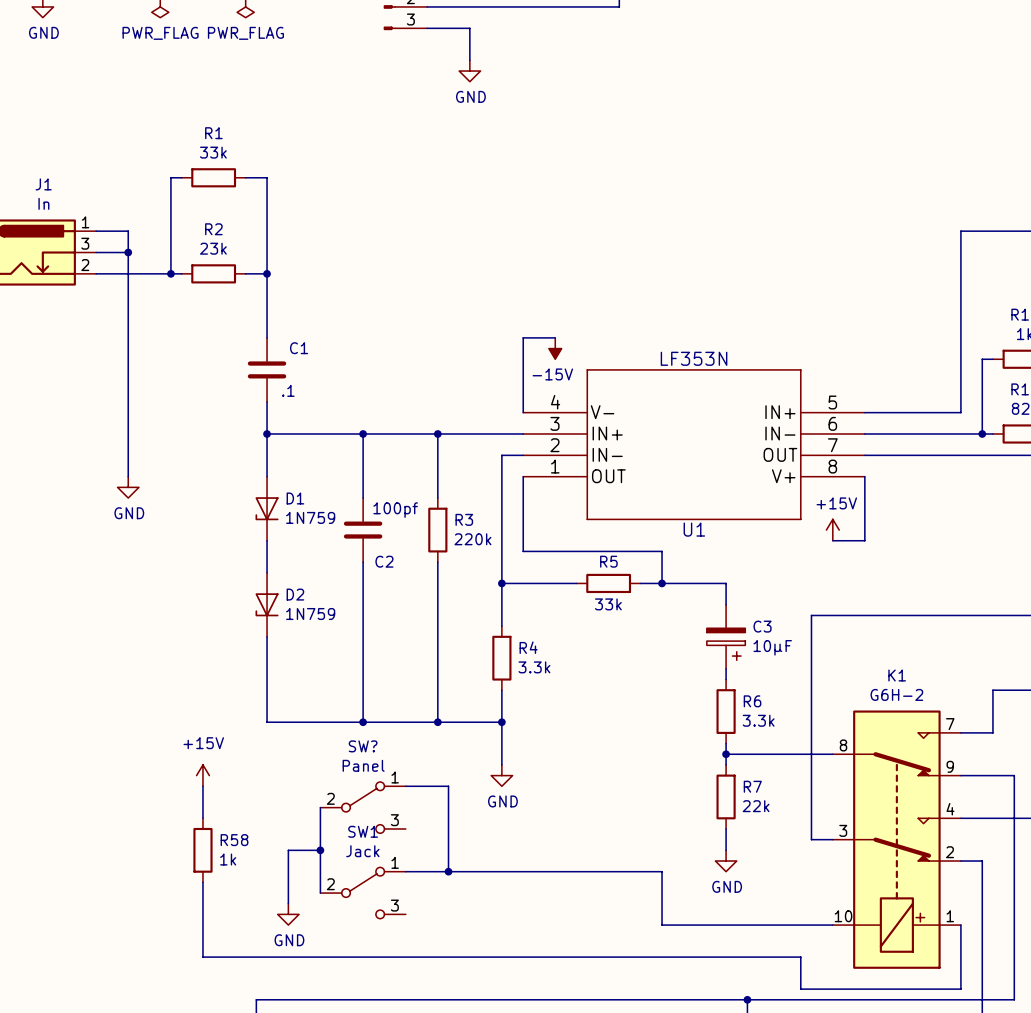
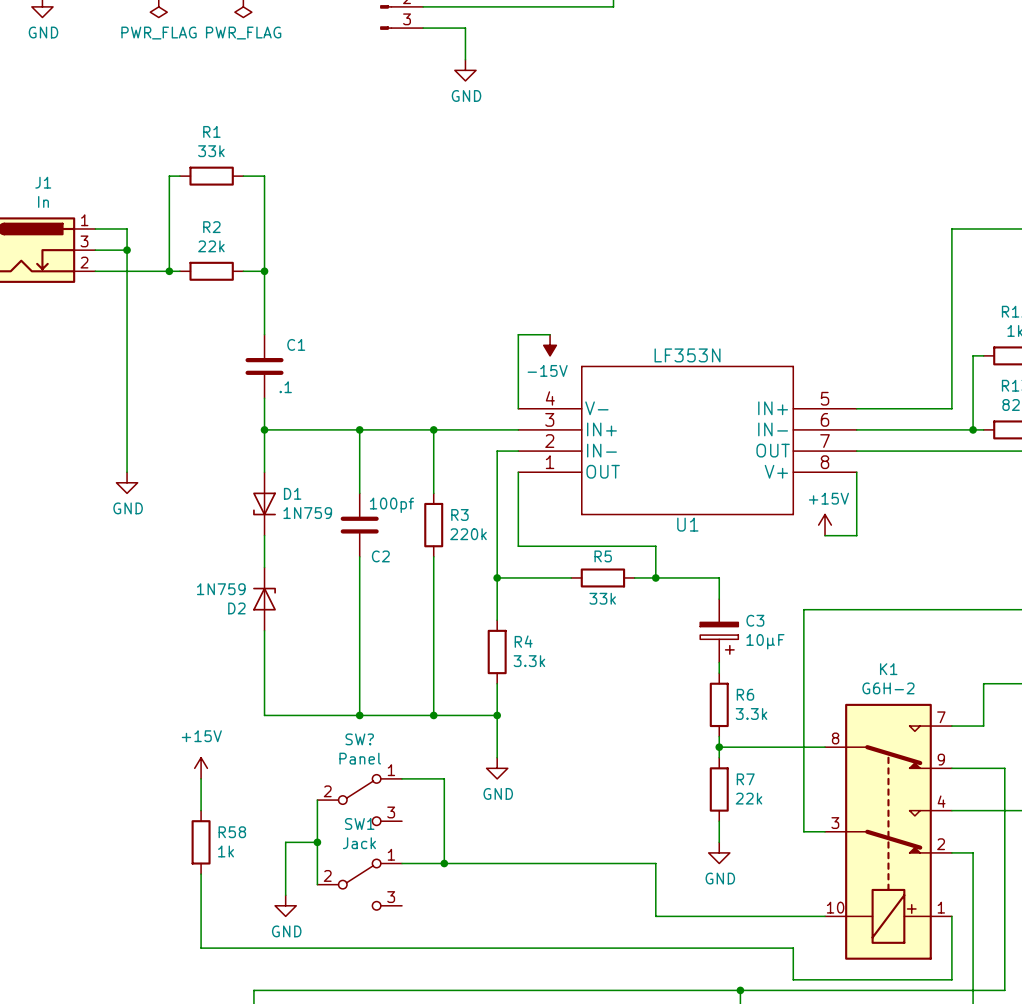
R2 value: 23k (213, 248) -> 22k (211, 246)
D2 rotation: 0° (267, 604) -> 180° (264, 599)

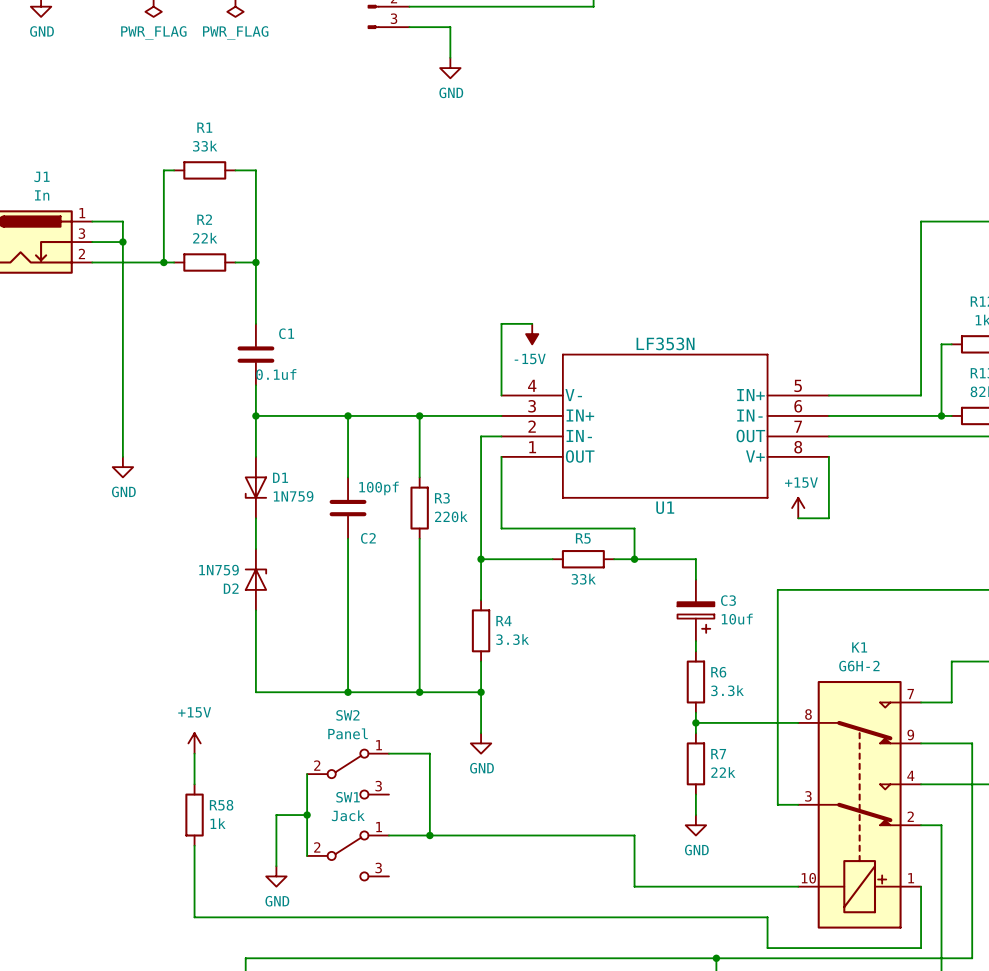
C1 value: .1 (285, 387) -> 0.1uf (276, 374)
C3 value: 10µF (765, 641) -> 10uf (737, 619)
SW? name: SW? (359, 739) -> SW2 (347, 715)

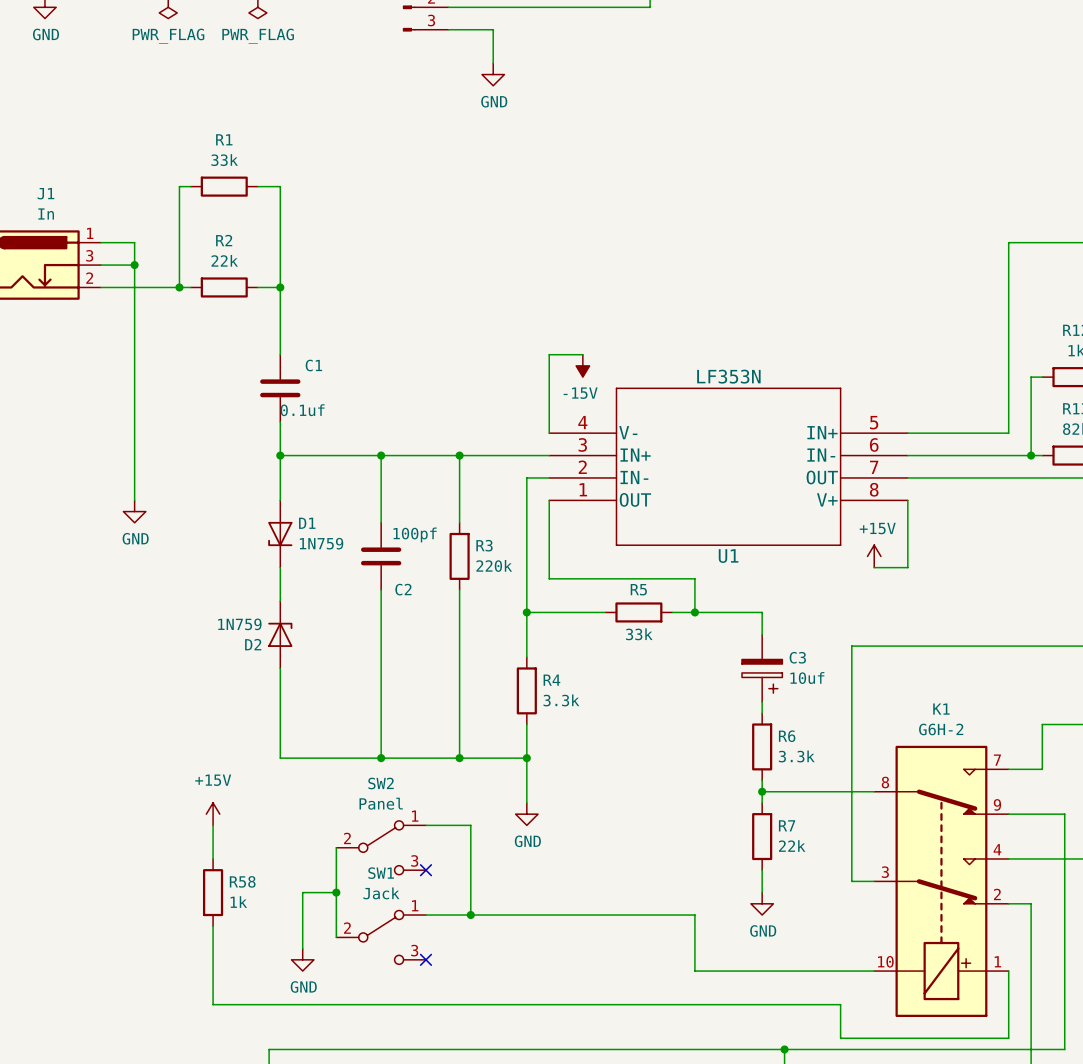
no-connect mark: none -> (425, 870)
no-connect mark: none -> (425, 959)

